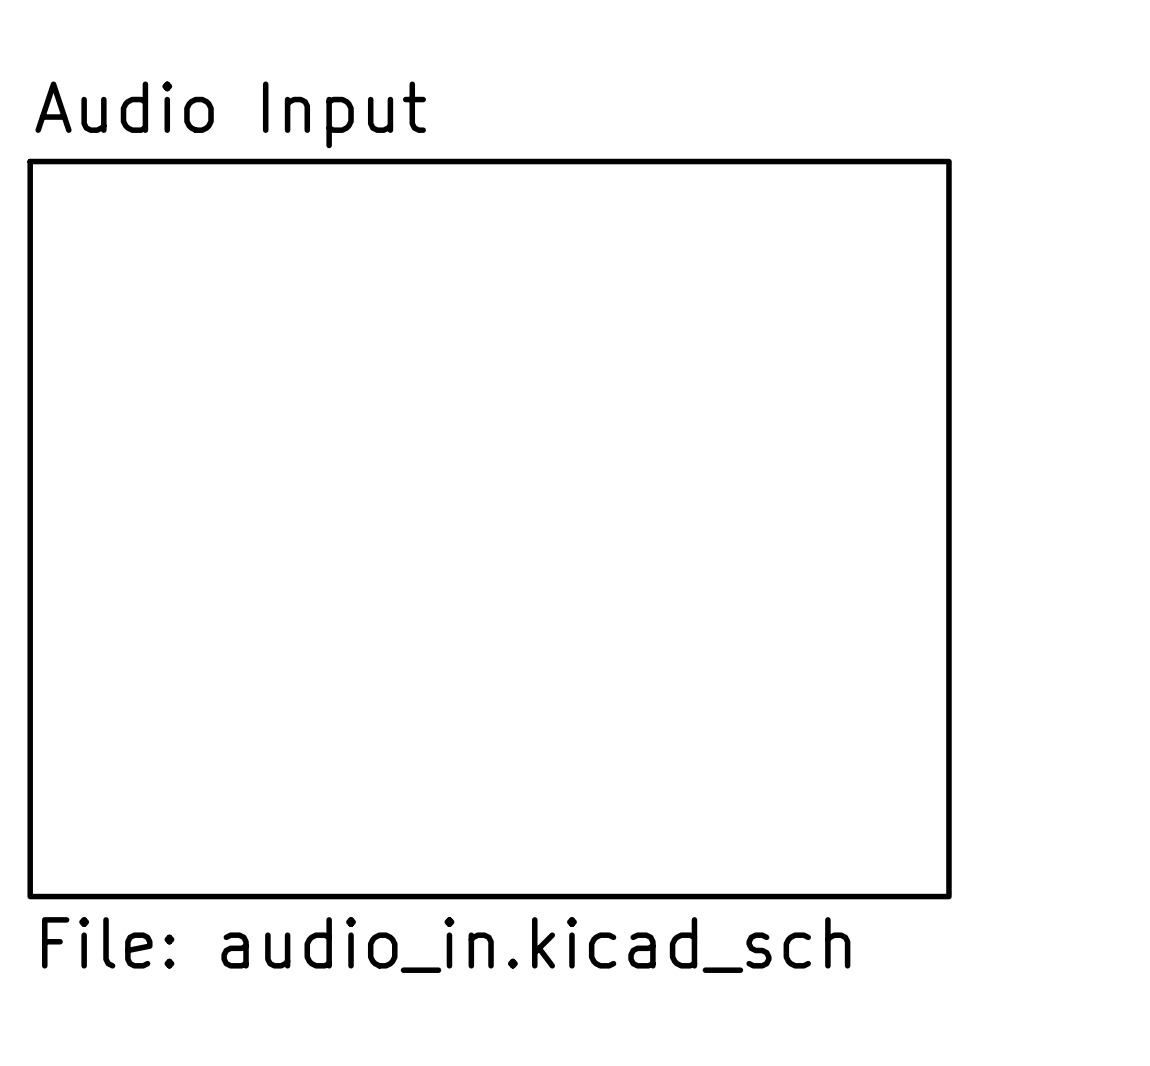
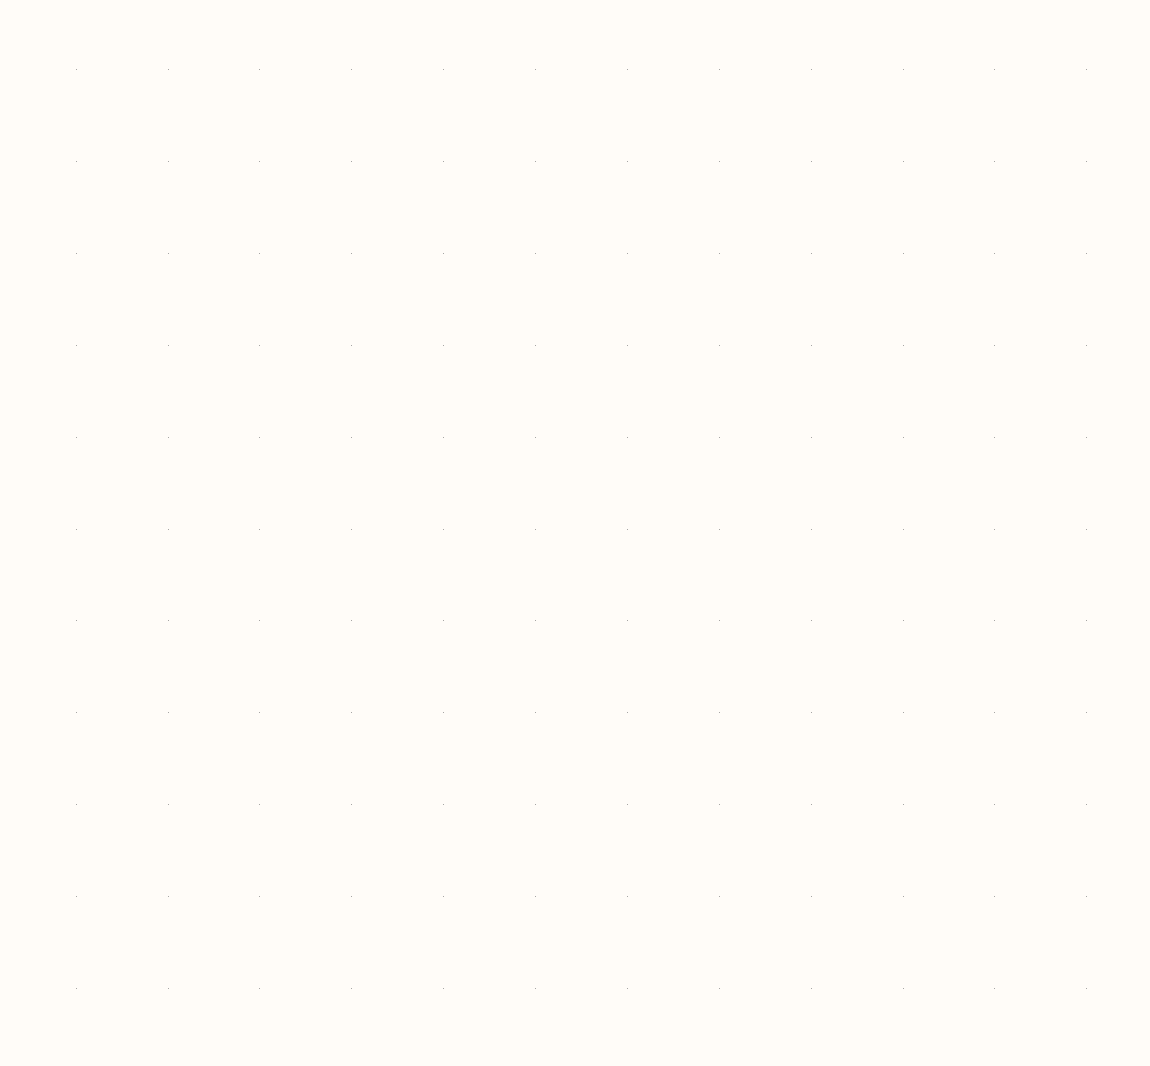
sheet Audio Input: File: audio_in.kicad_sch (489, 529) -> none

